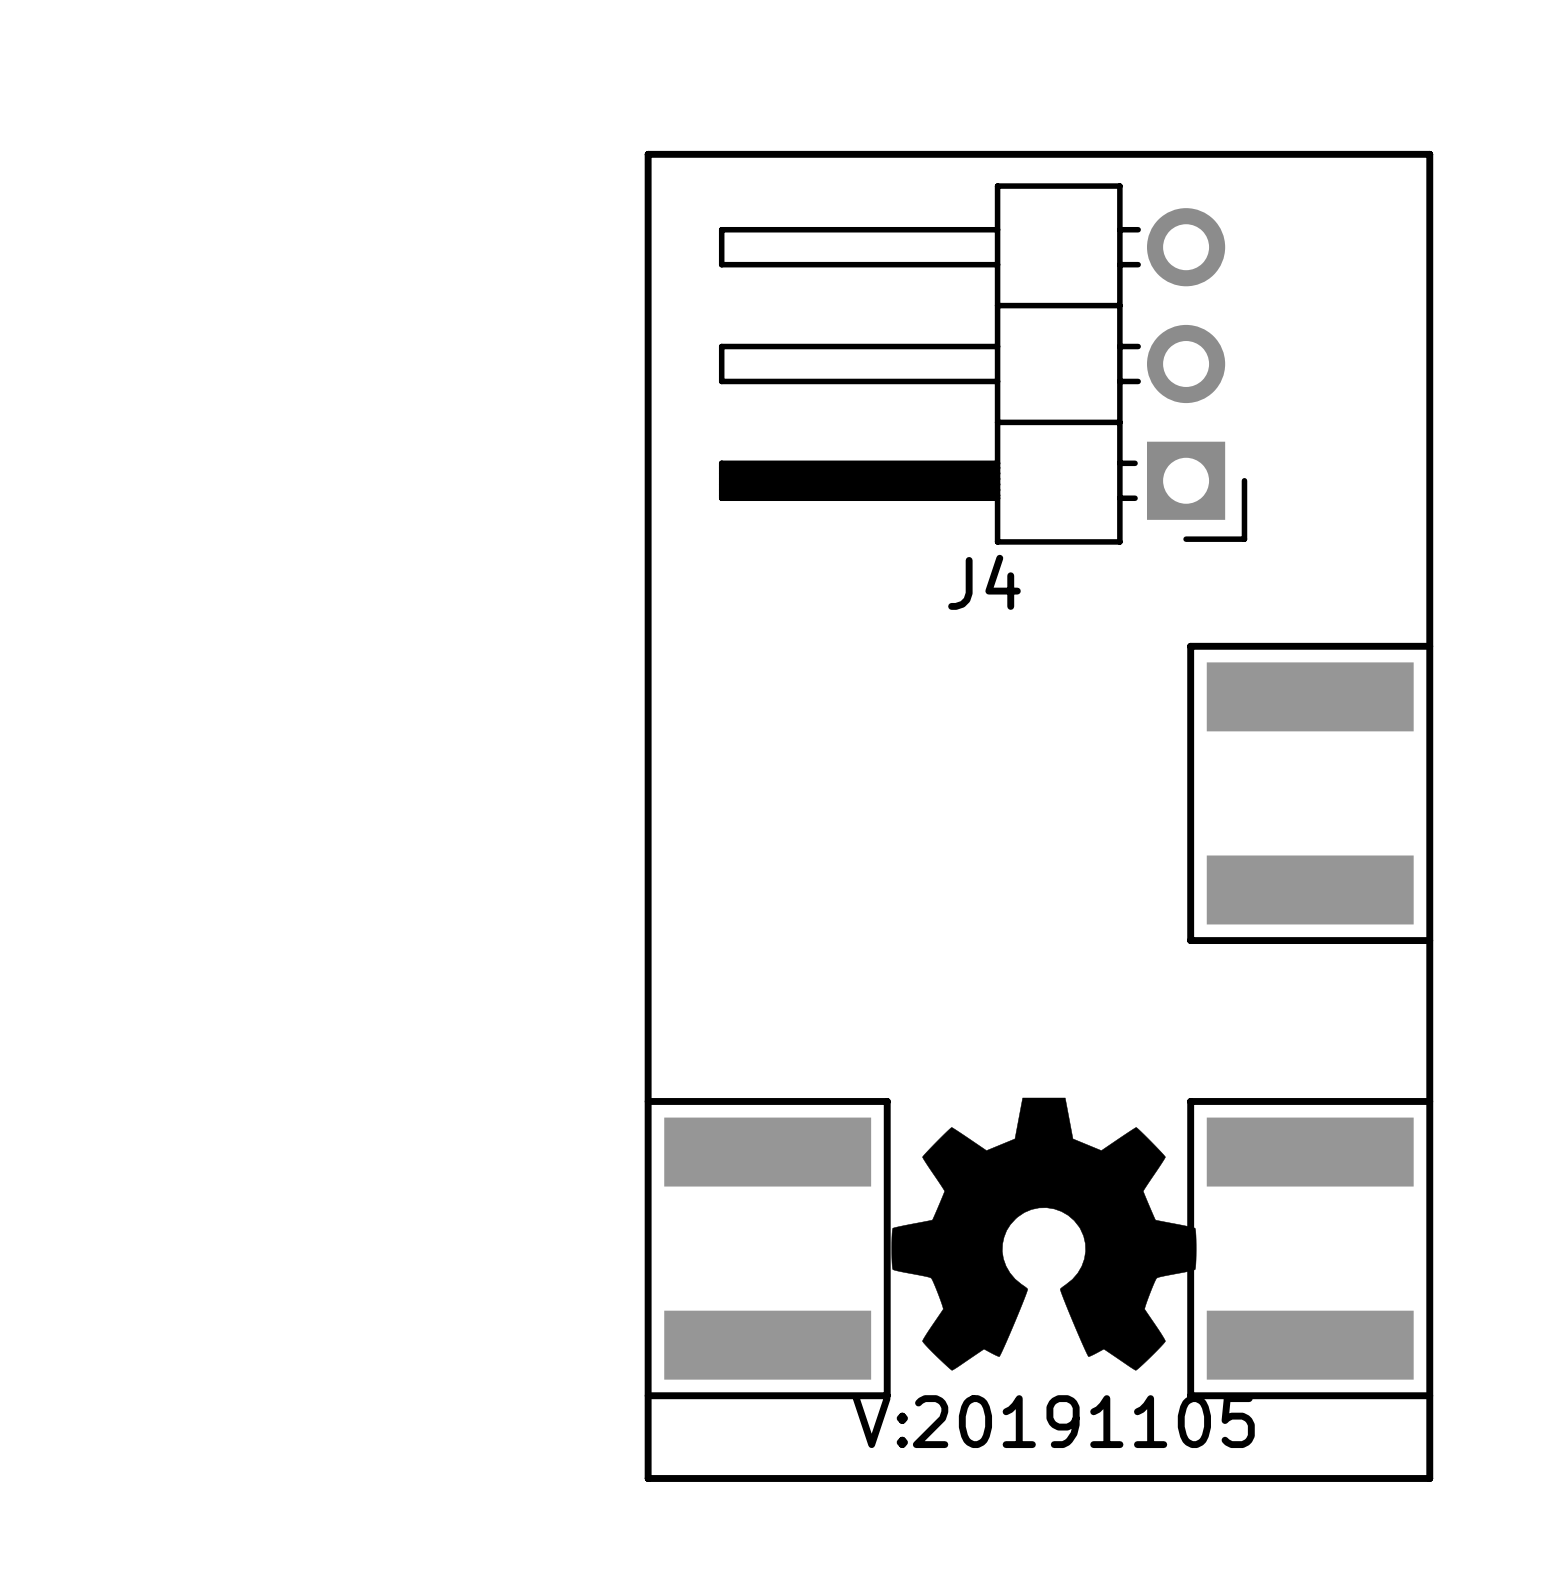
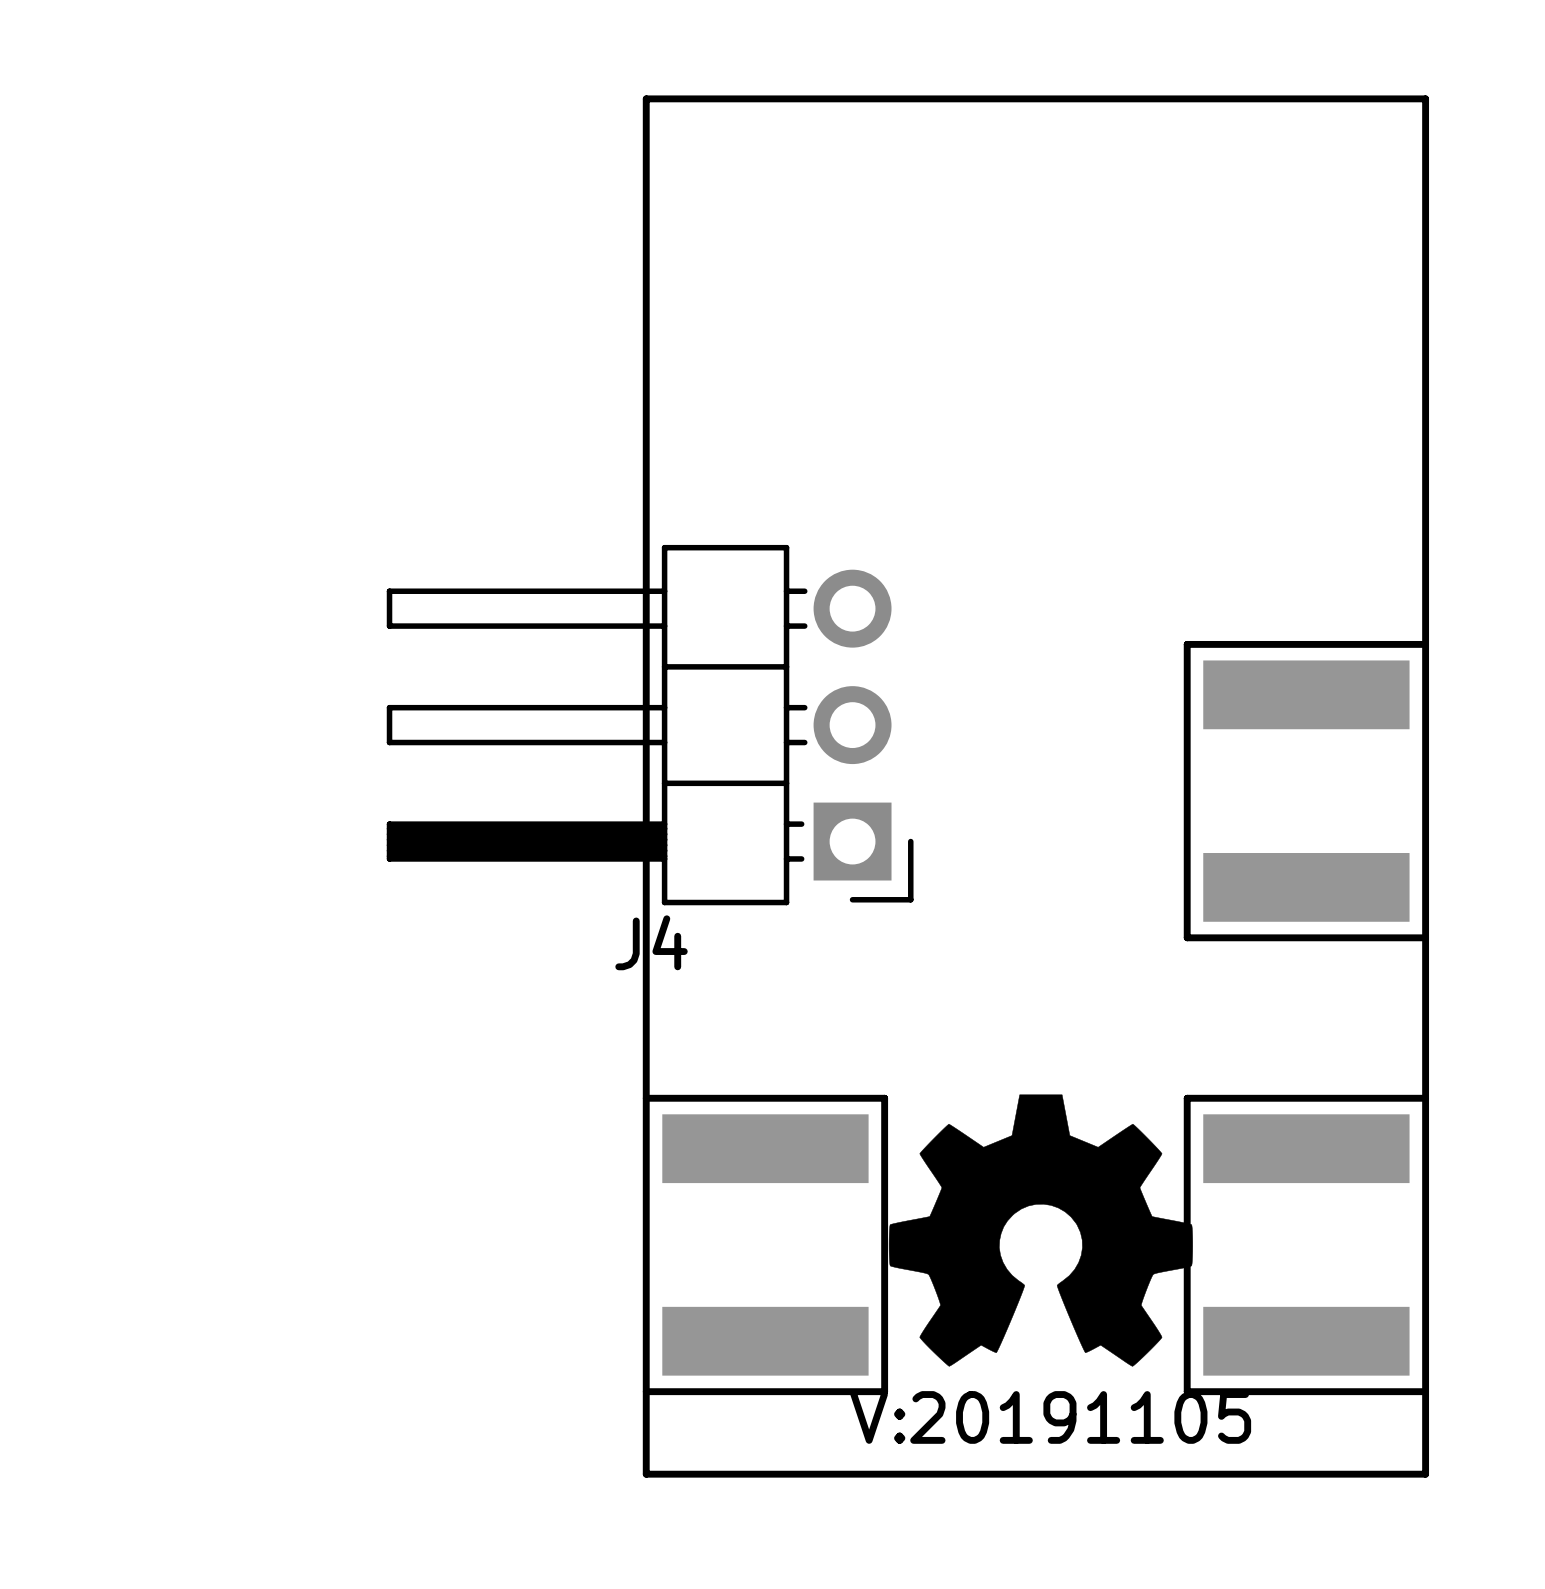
board edge: (1429, 154) (648, 154) -> (1425, 153) (1425, 98) (646, 98) (646, 153)
J4 position: (983, 363) -> (650, 725)

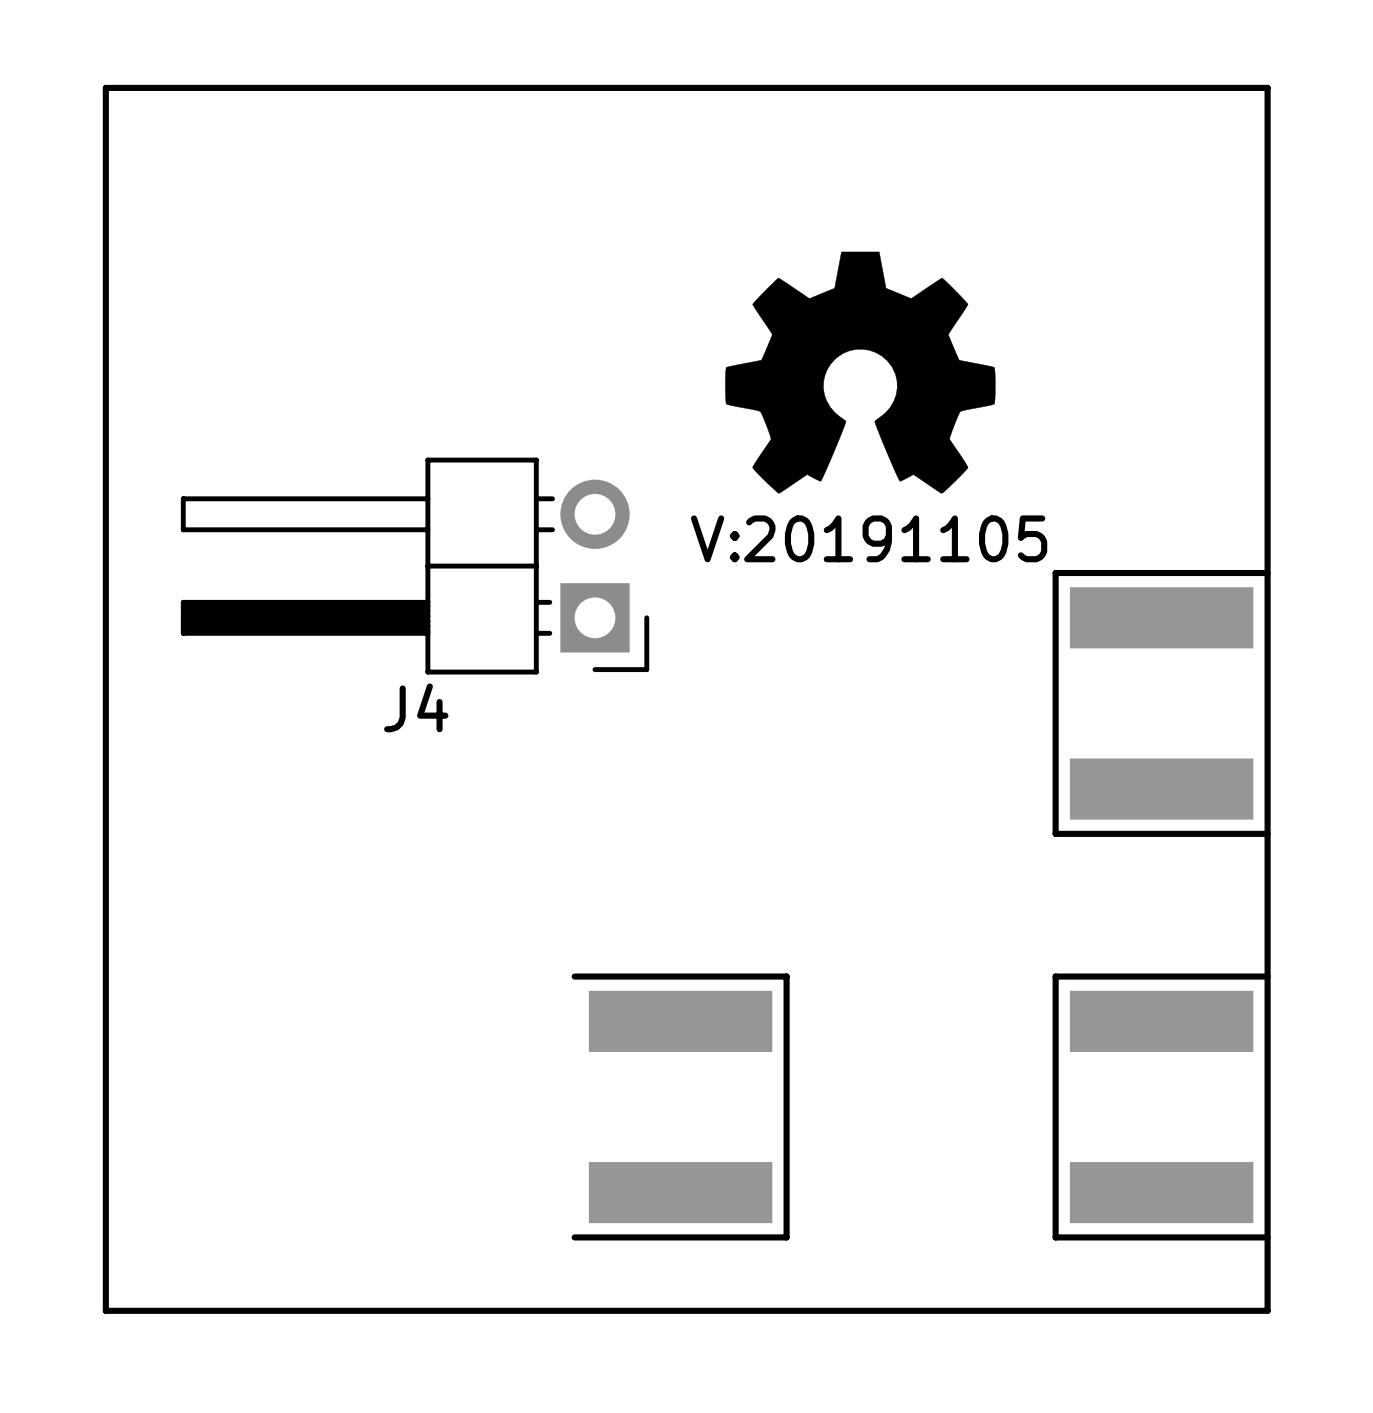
board edge: (646, 98) (646, 1474) -> (574, 87) (105, 87) (105, 1310) (574, 1310)
J4 footprint: [386, 544, 914, 906] -> [180, 457, 650, 675]
drawing position: (1040, 1230) -> (860, 372)
drawing position: (1050, 1417) -> (869, 538)

